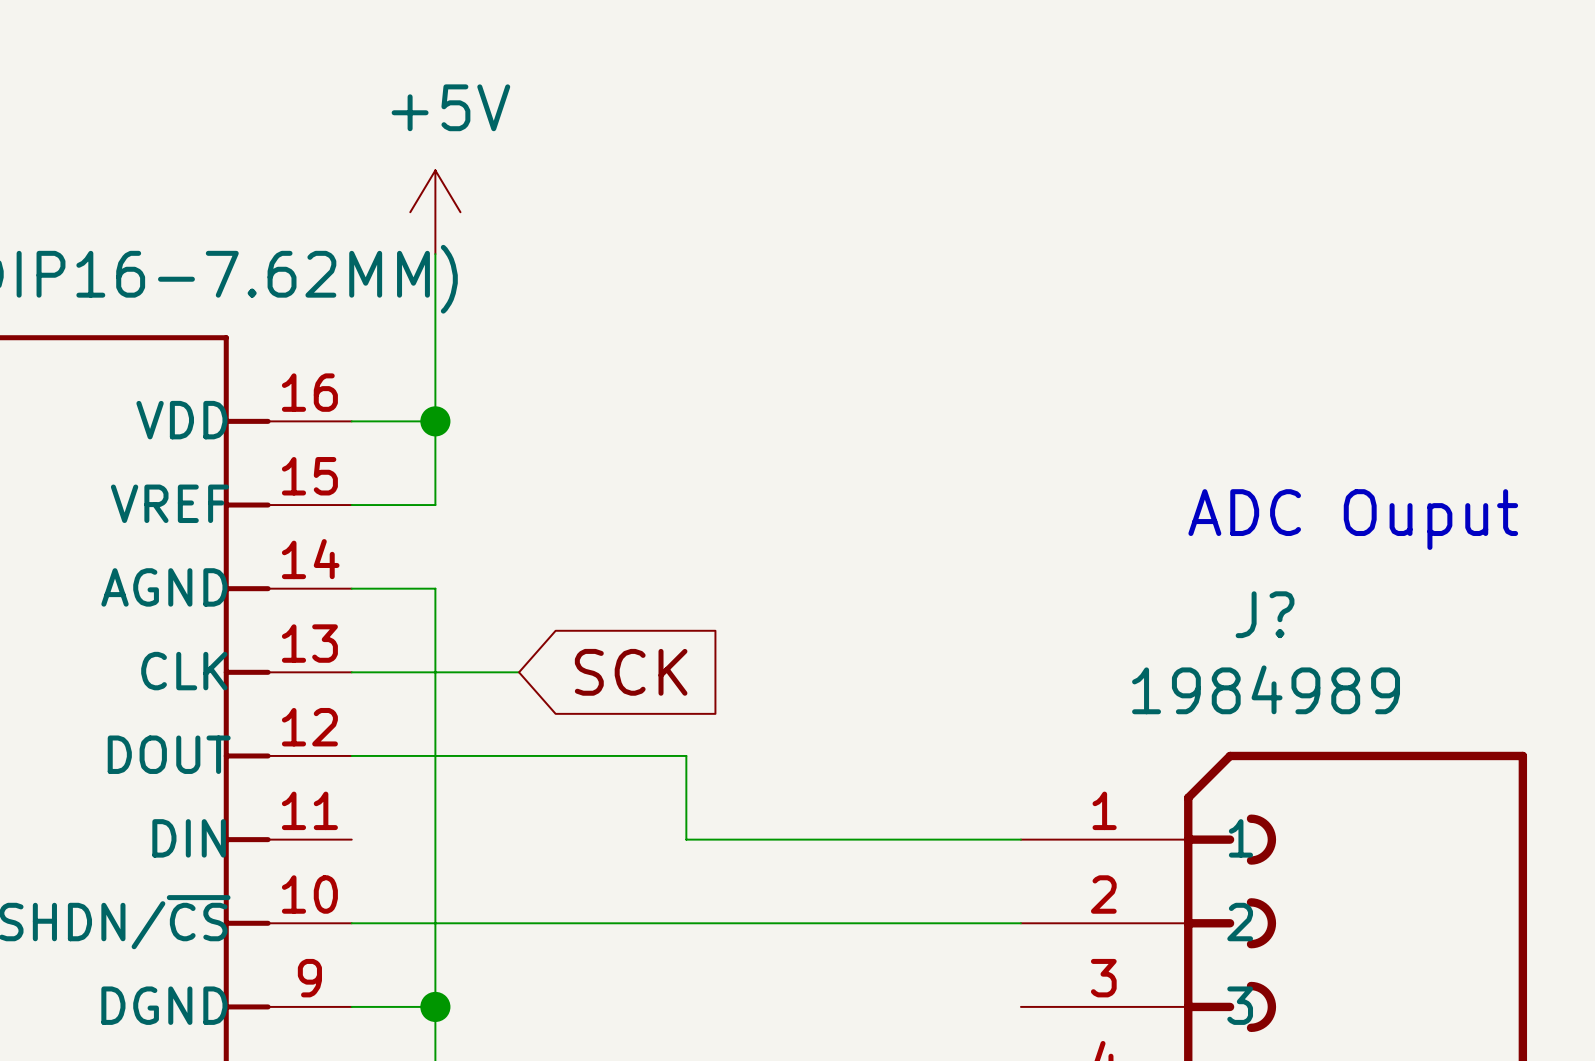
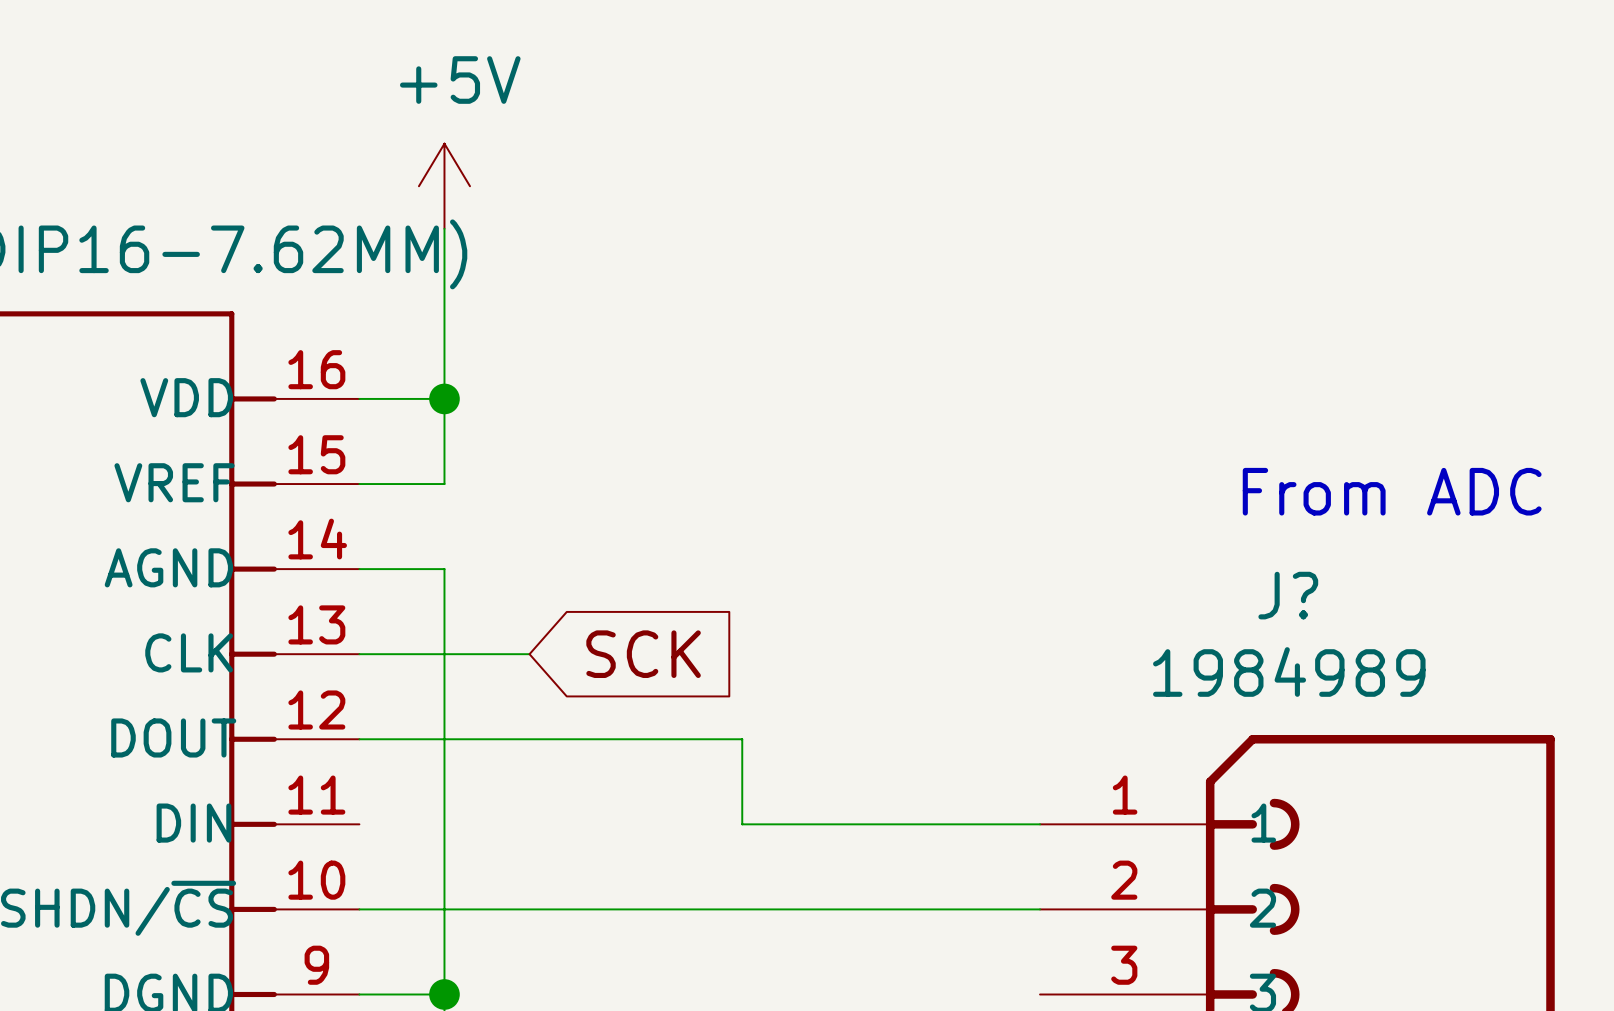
text: ADC Ouput (1353, 519) -> From ADC (1392, 491)
wire: (686, 755) (686, 839) (728, 839) -> (699, 739) (742, 739) (742, 824)

